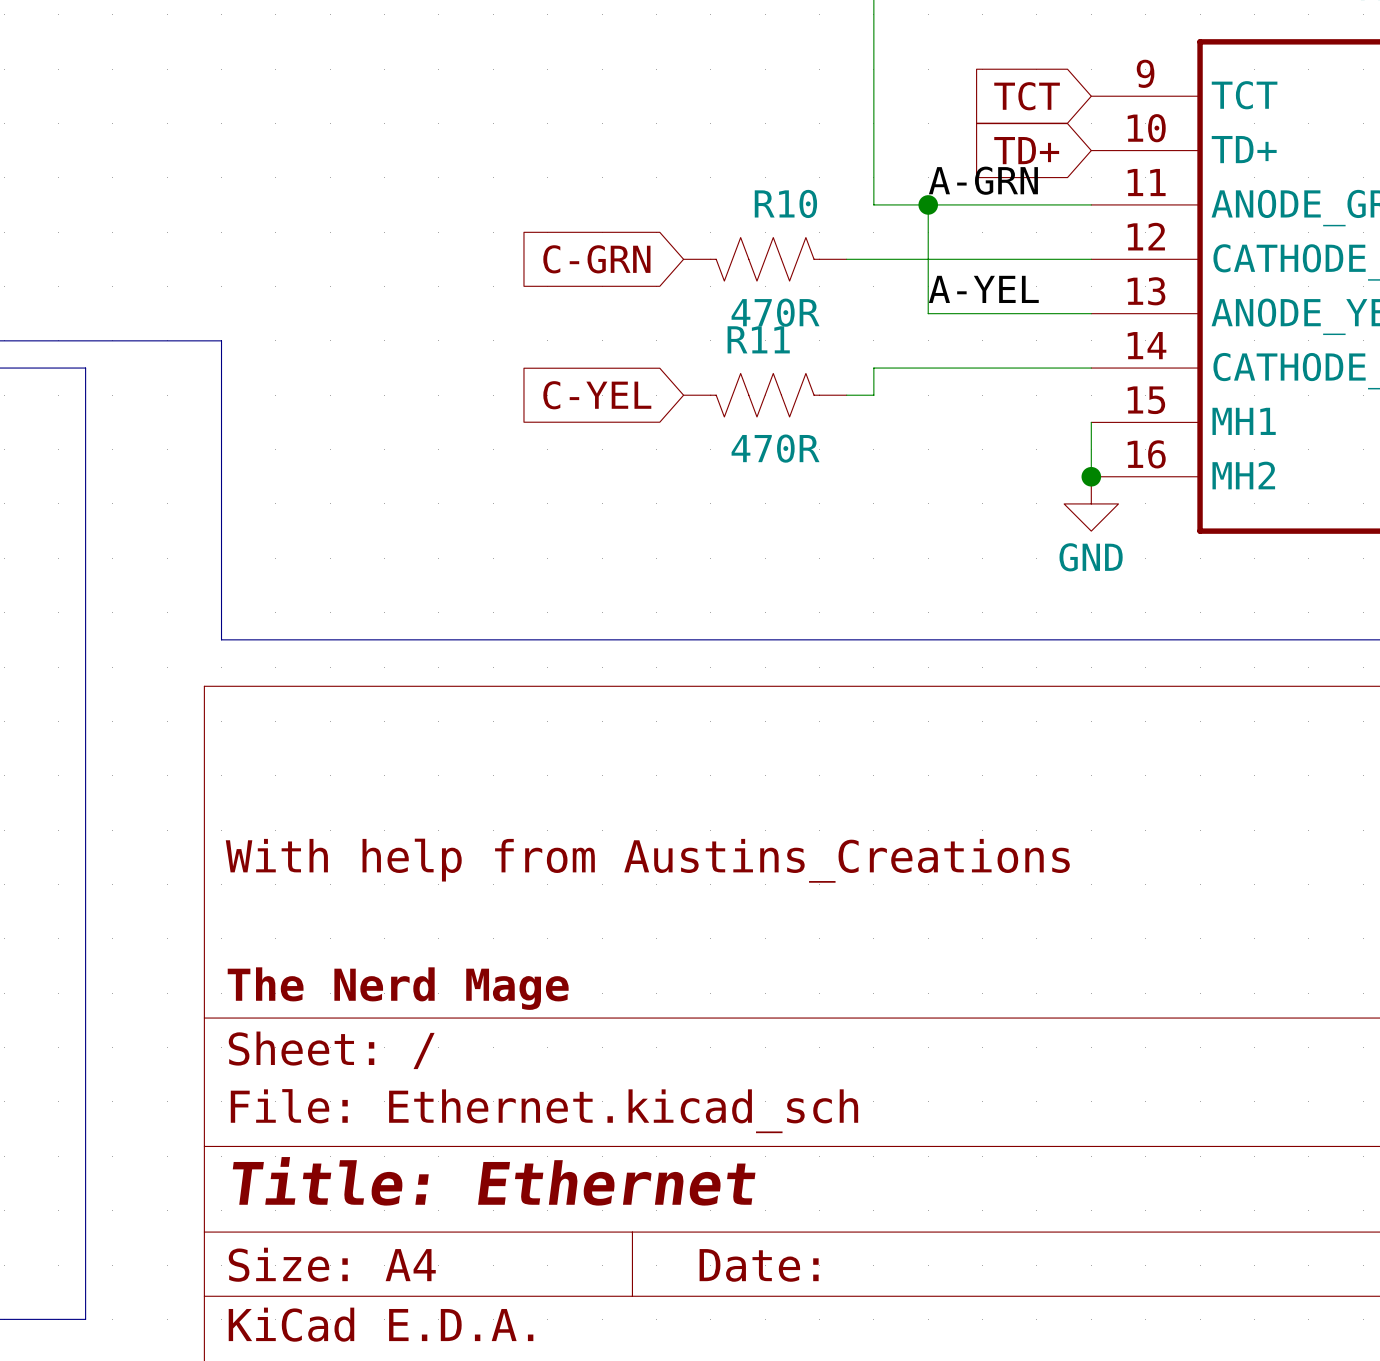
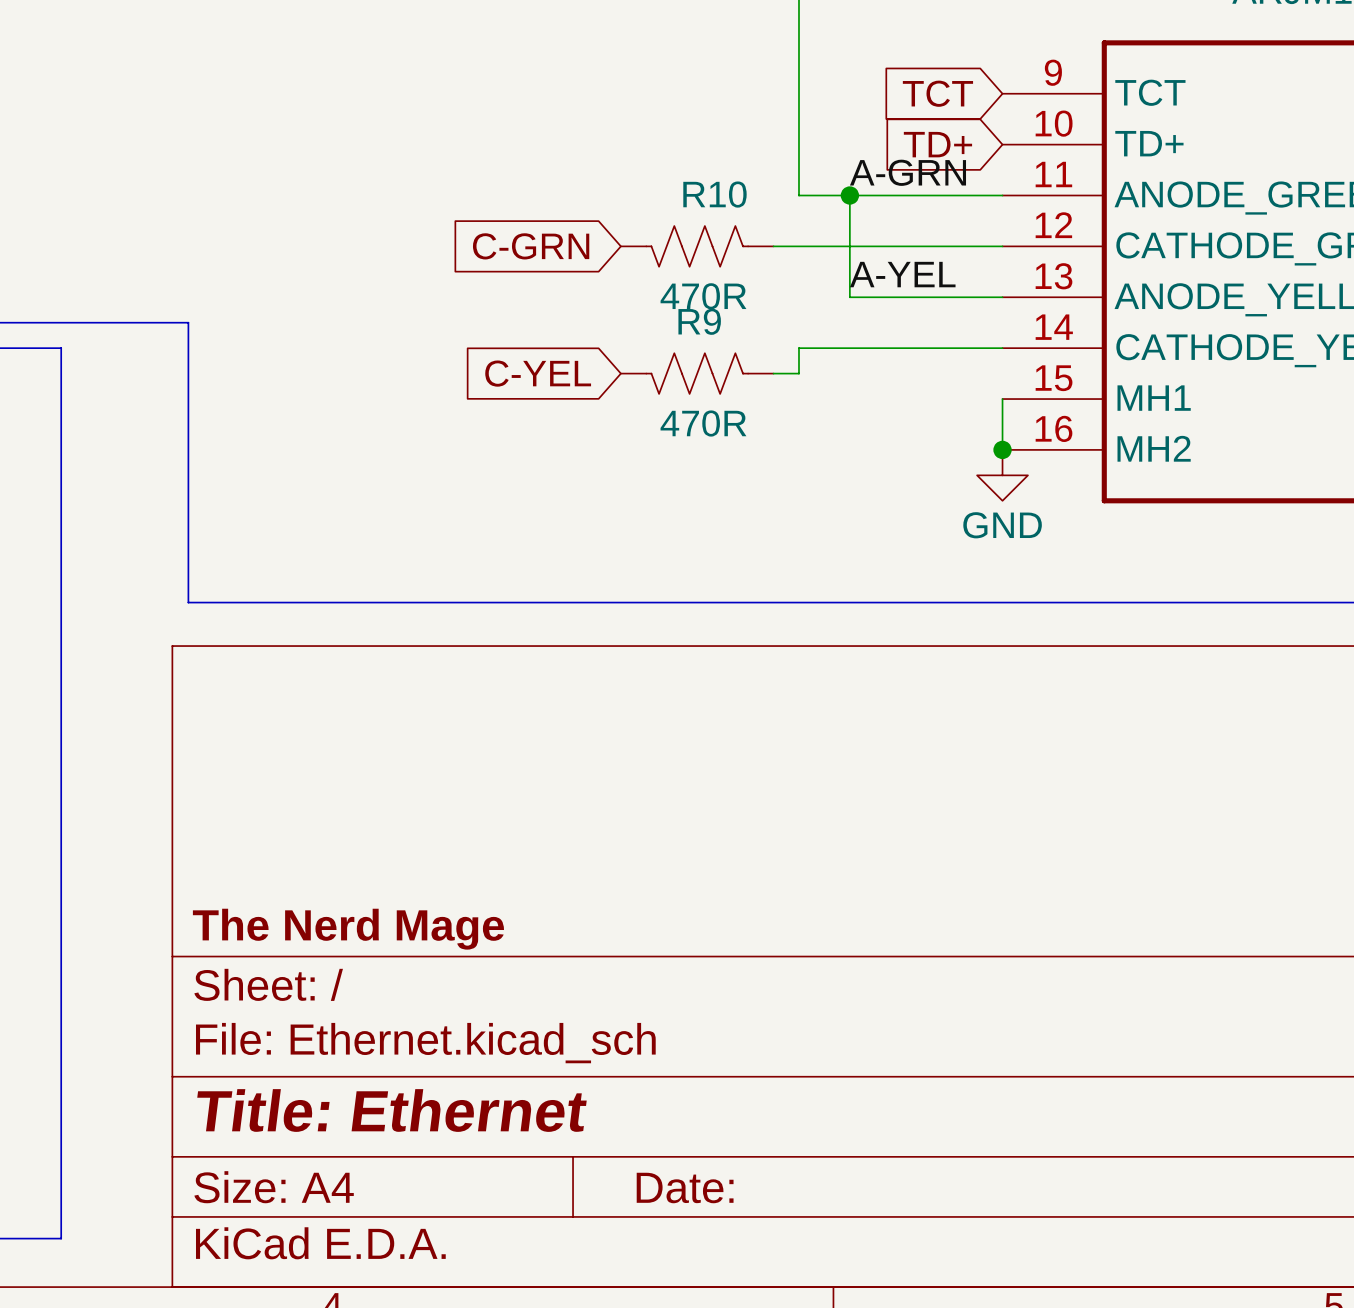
R11 name: R11 (758, 339) -> R9 (699, 321)
title block: With help from Austins_Creations (647, 860) -> none

